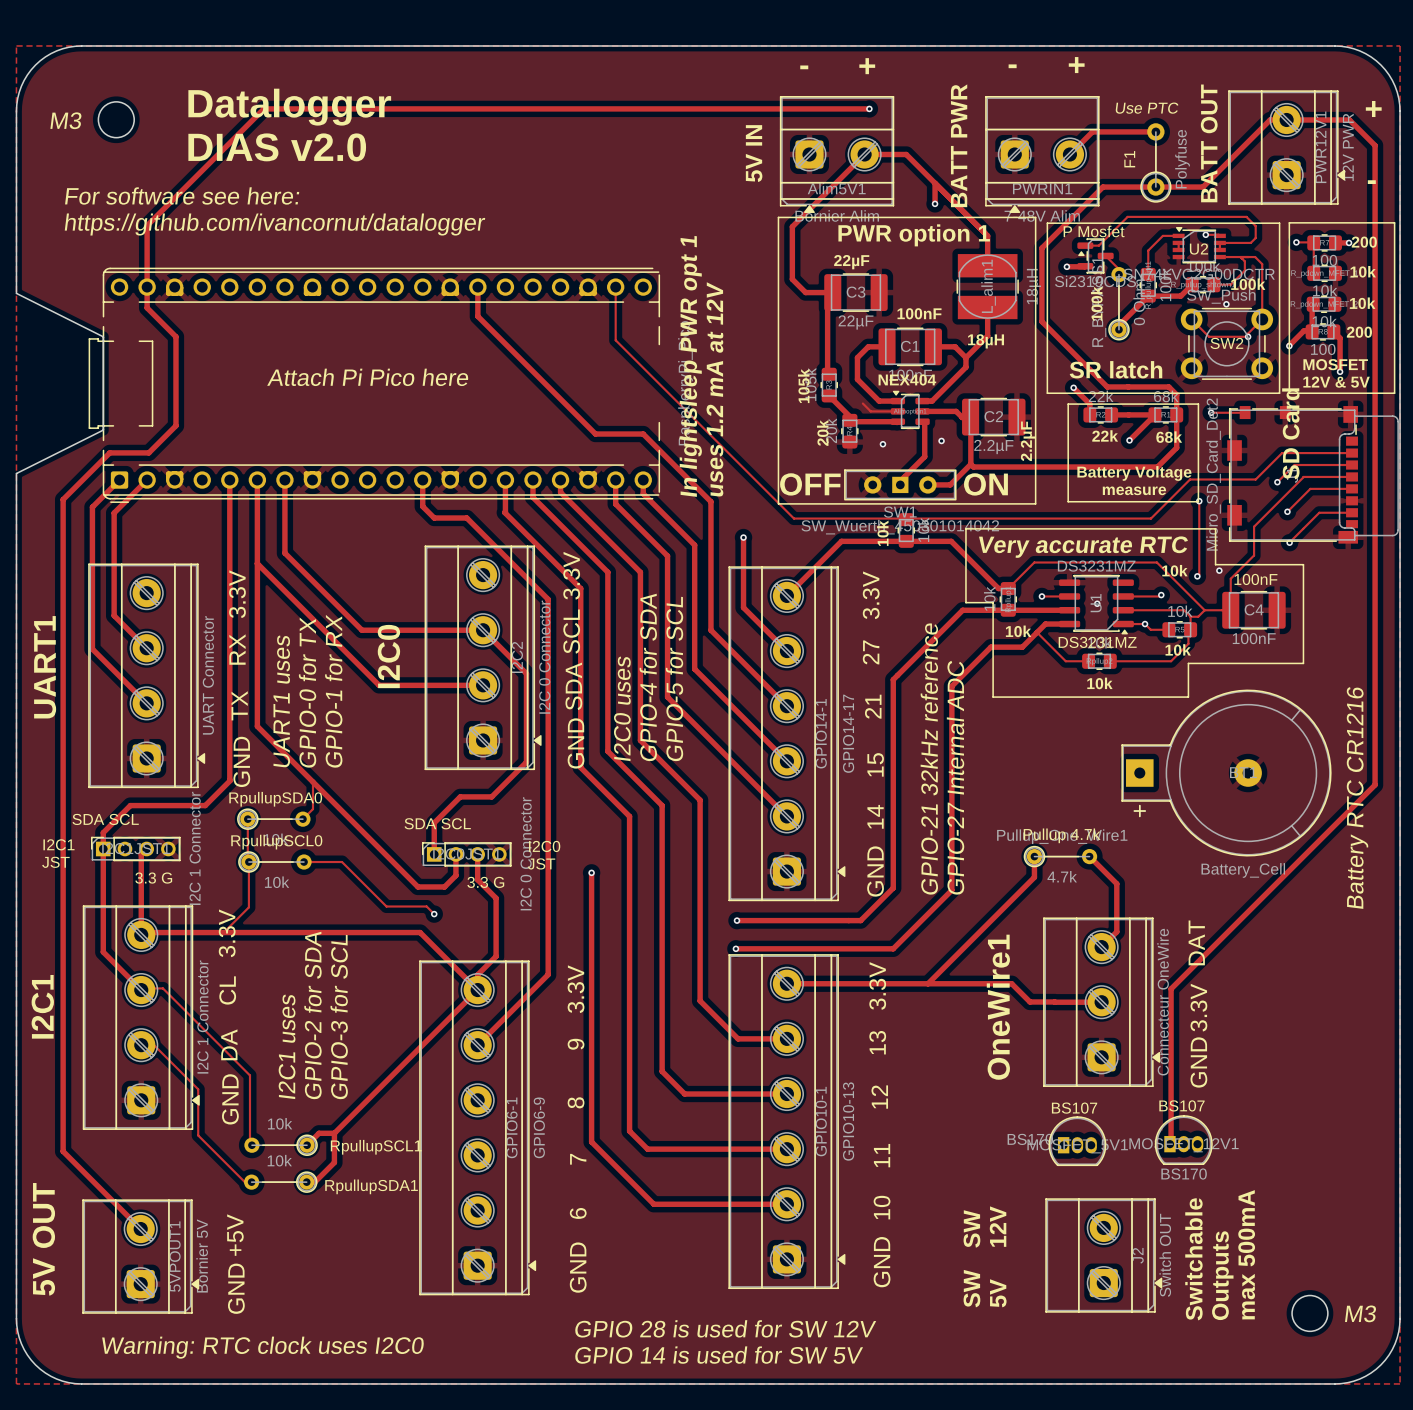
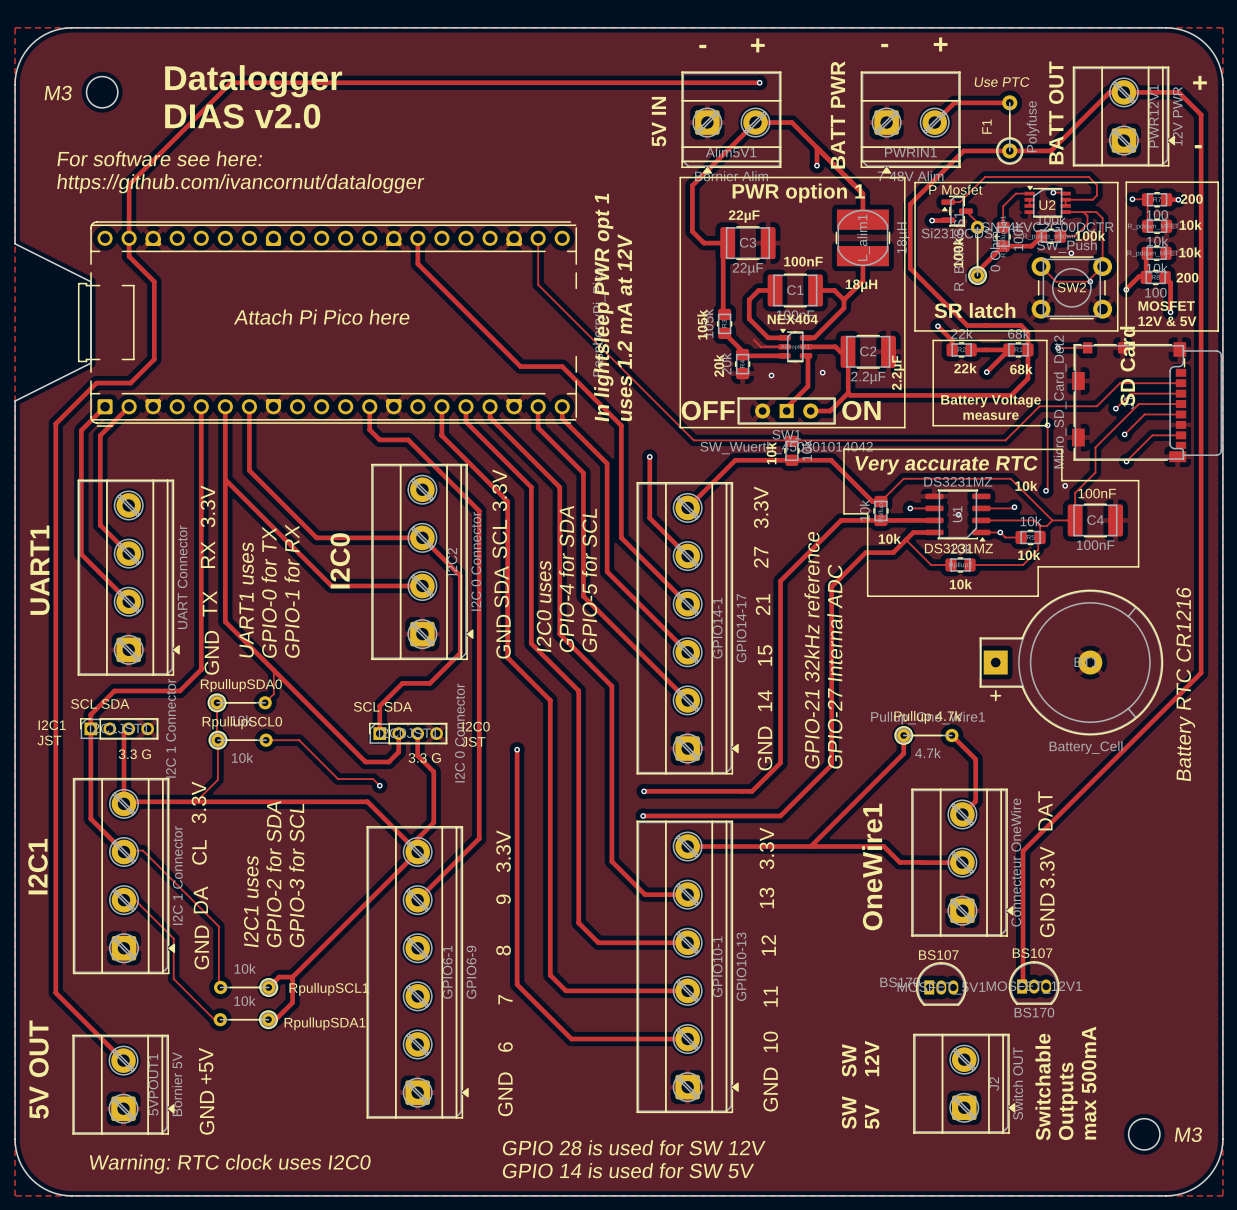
text: SDA SCL (105, 819) -> SCL SDA (100, 704)
text: SDA SCL (437, 823) -> SCL SDA (383, 706)

